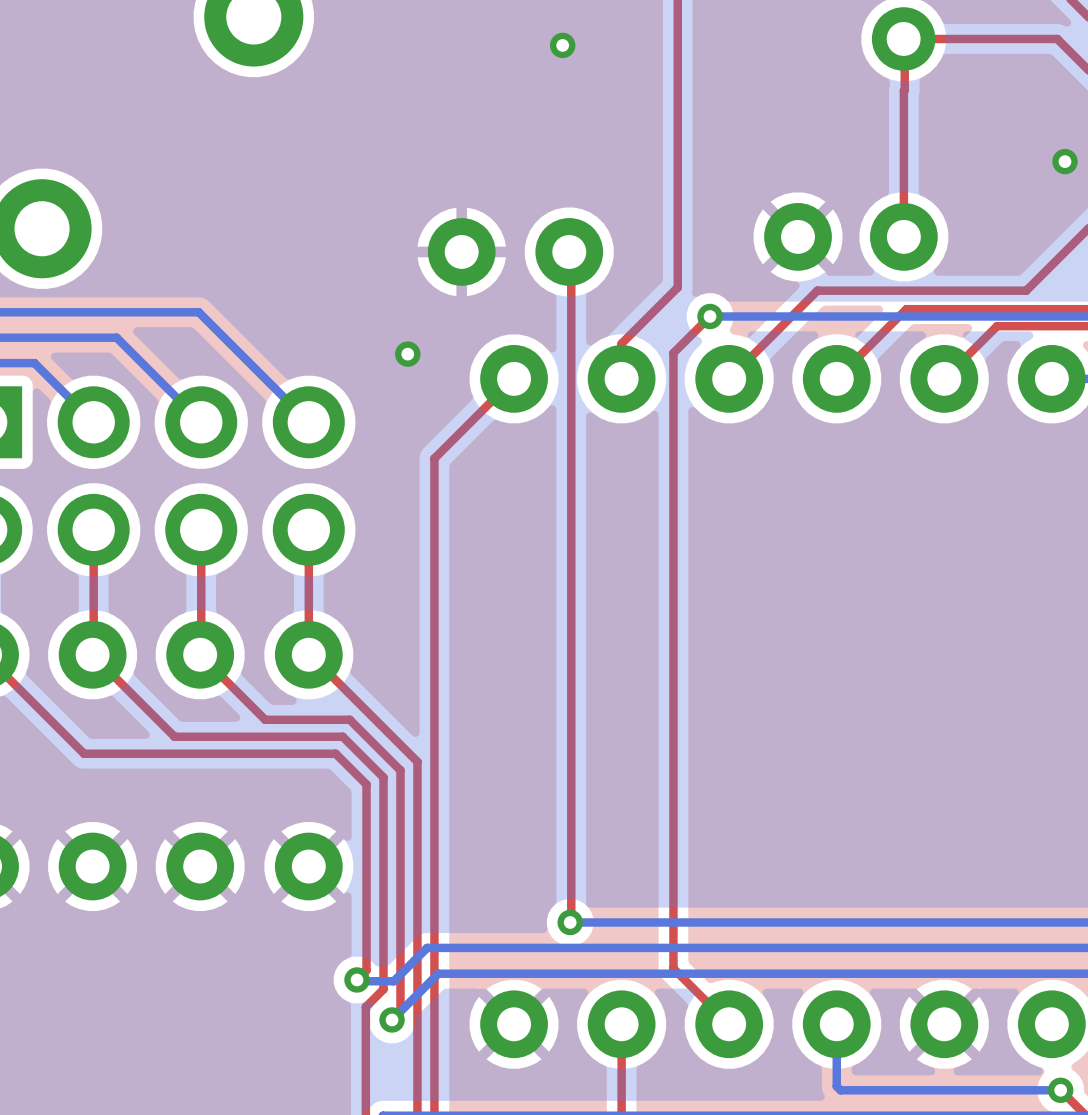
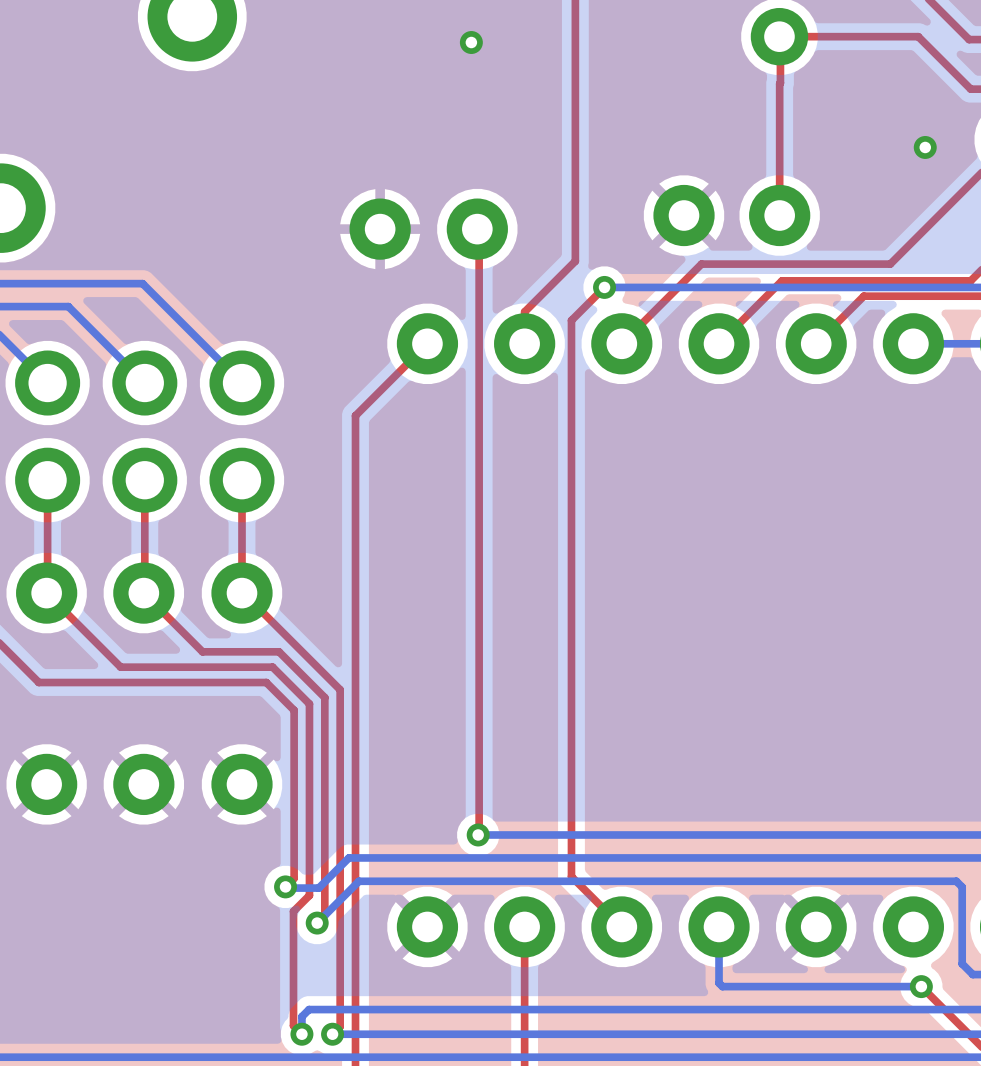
via: (407, 354) -> none

